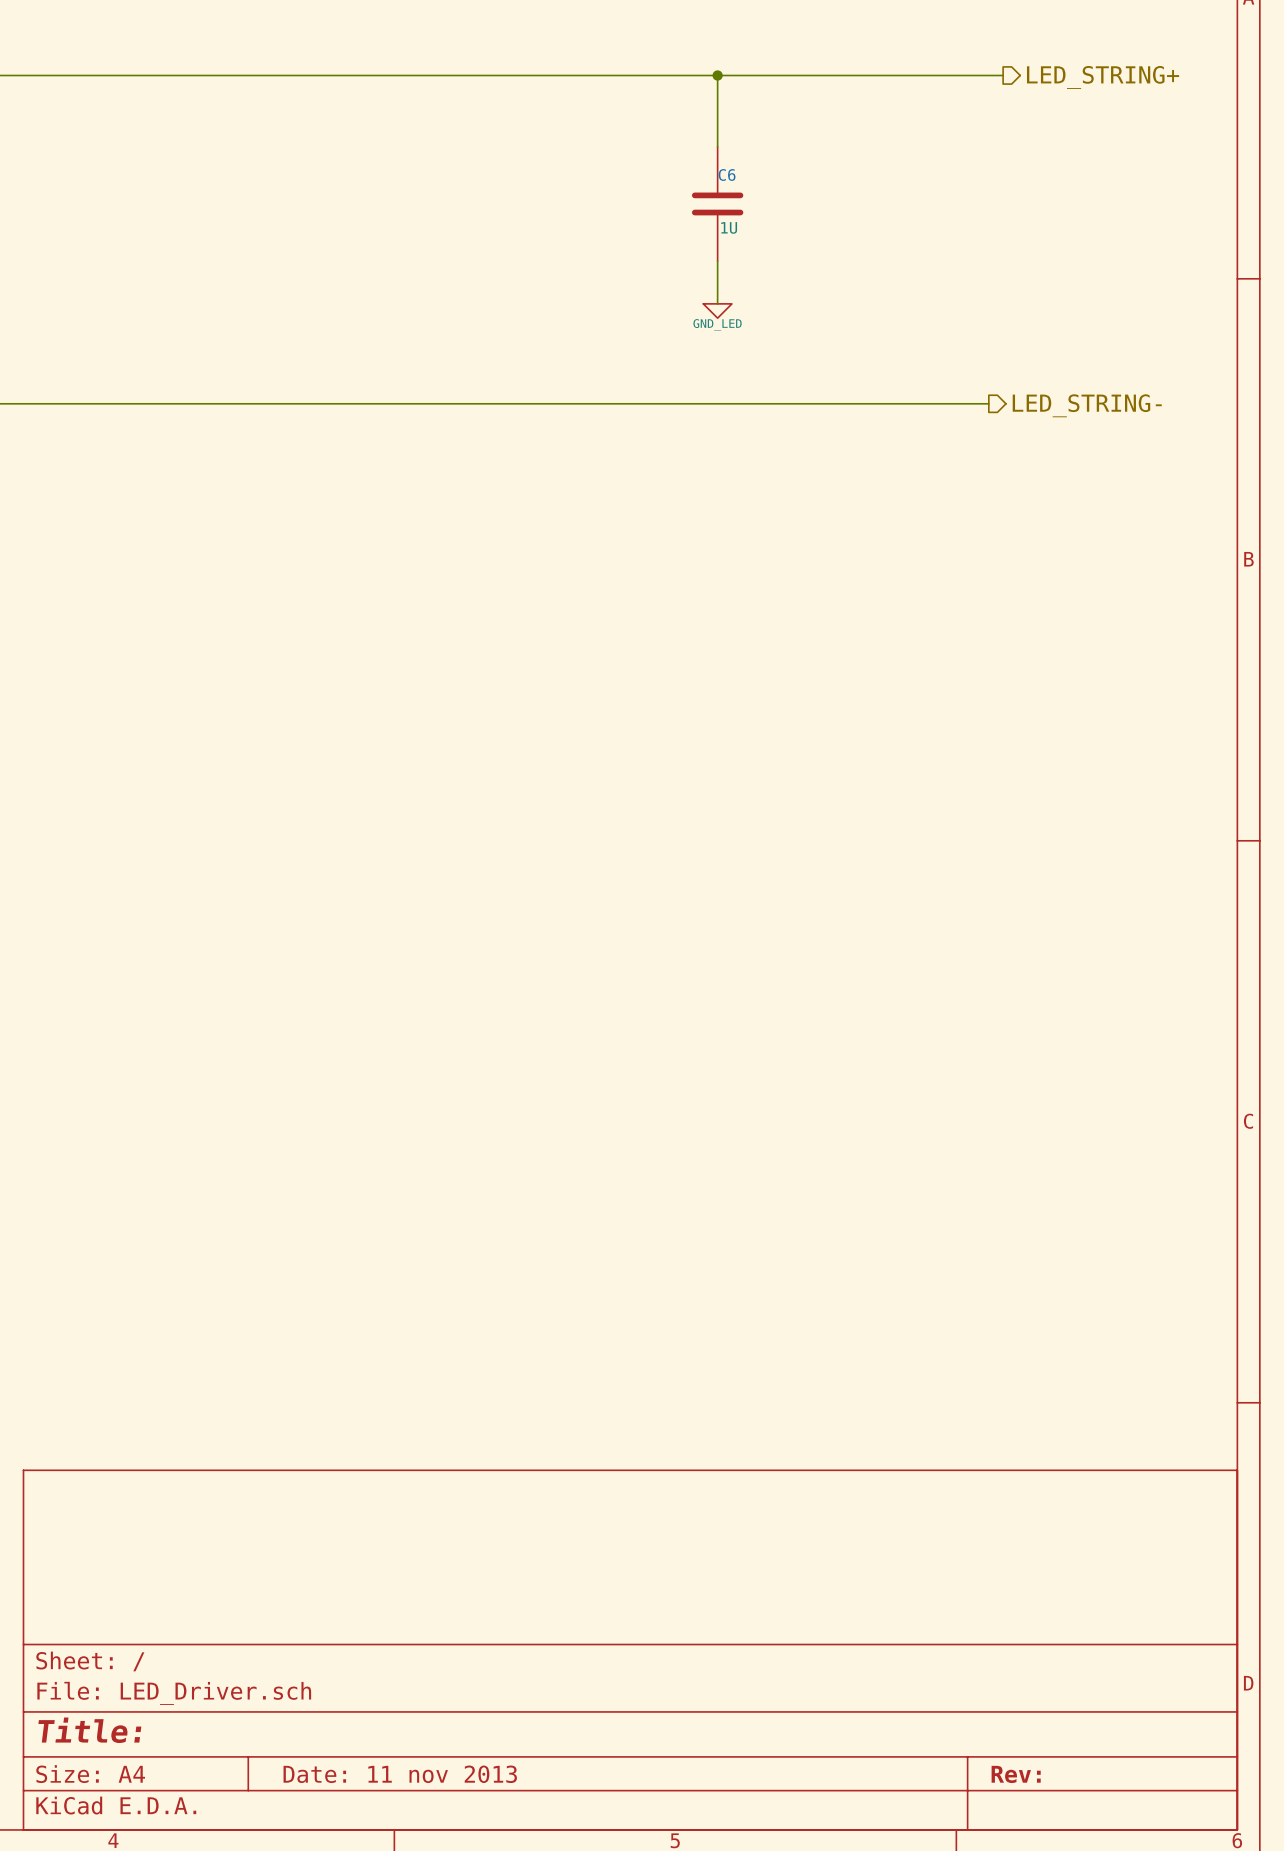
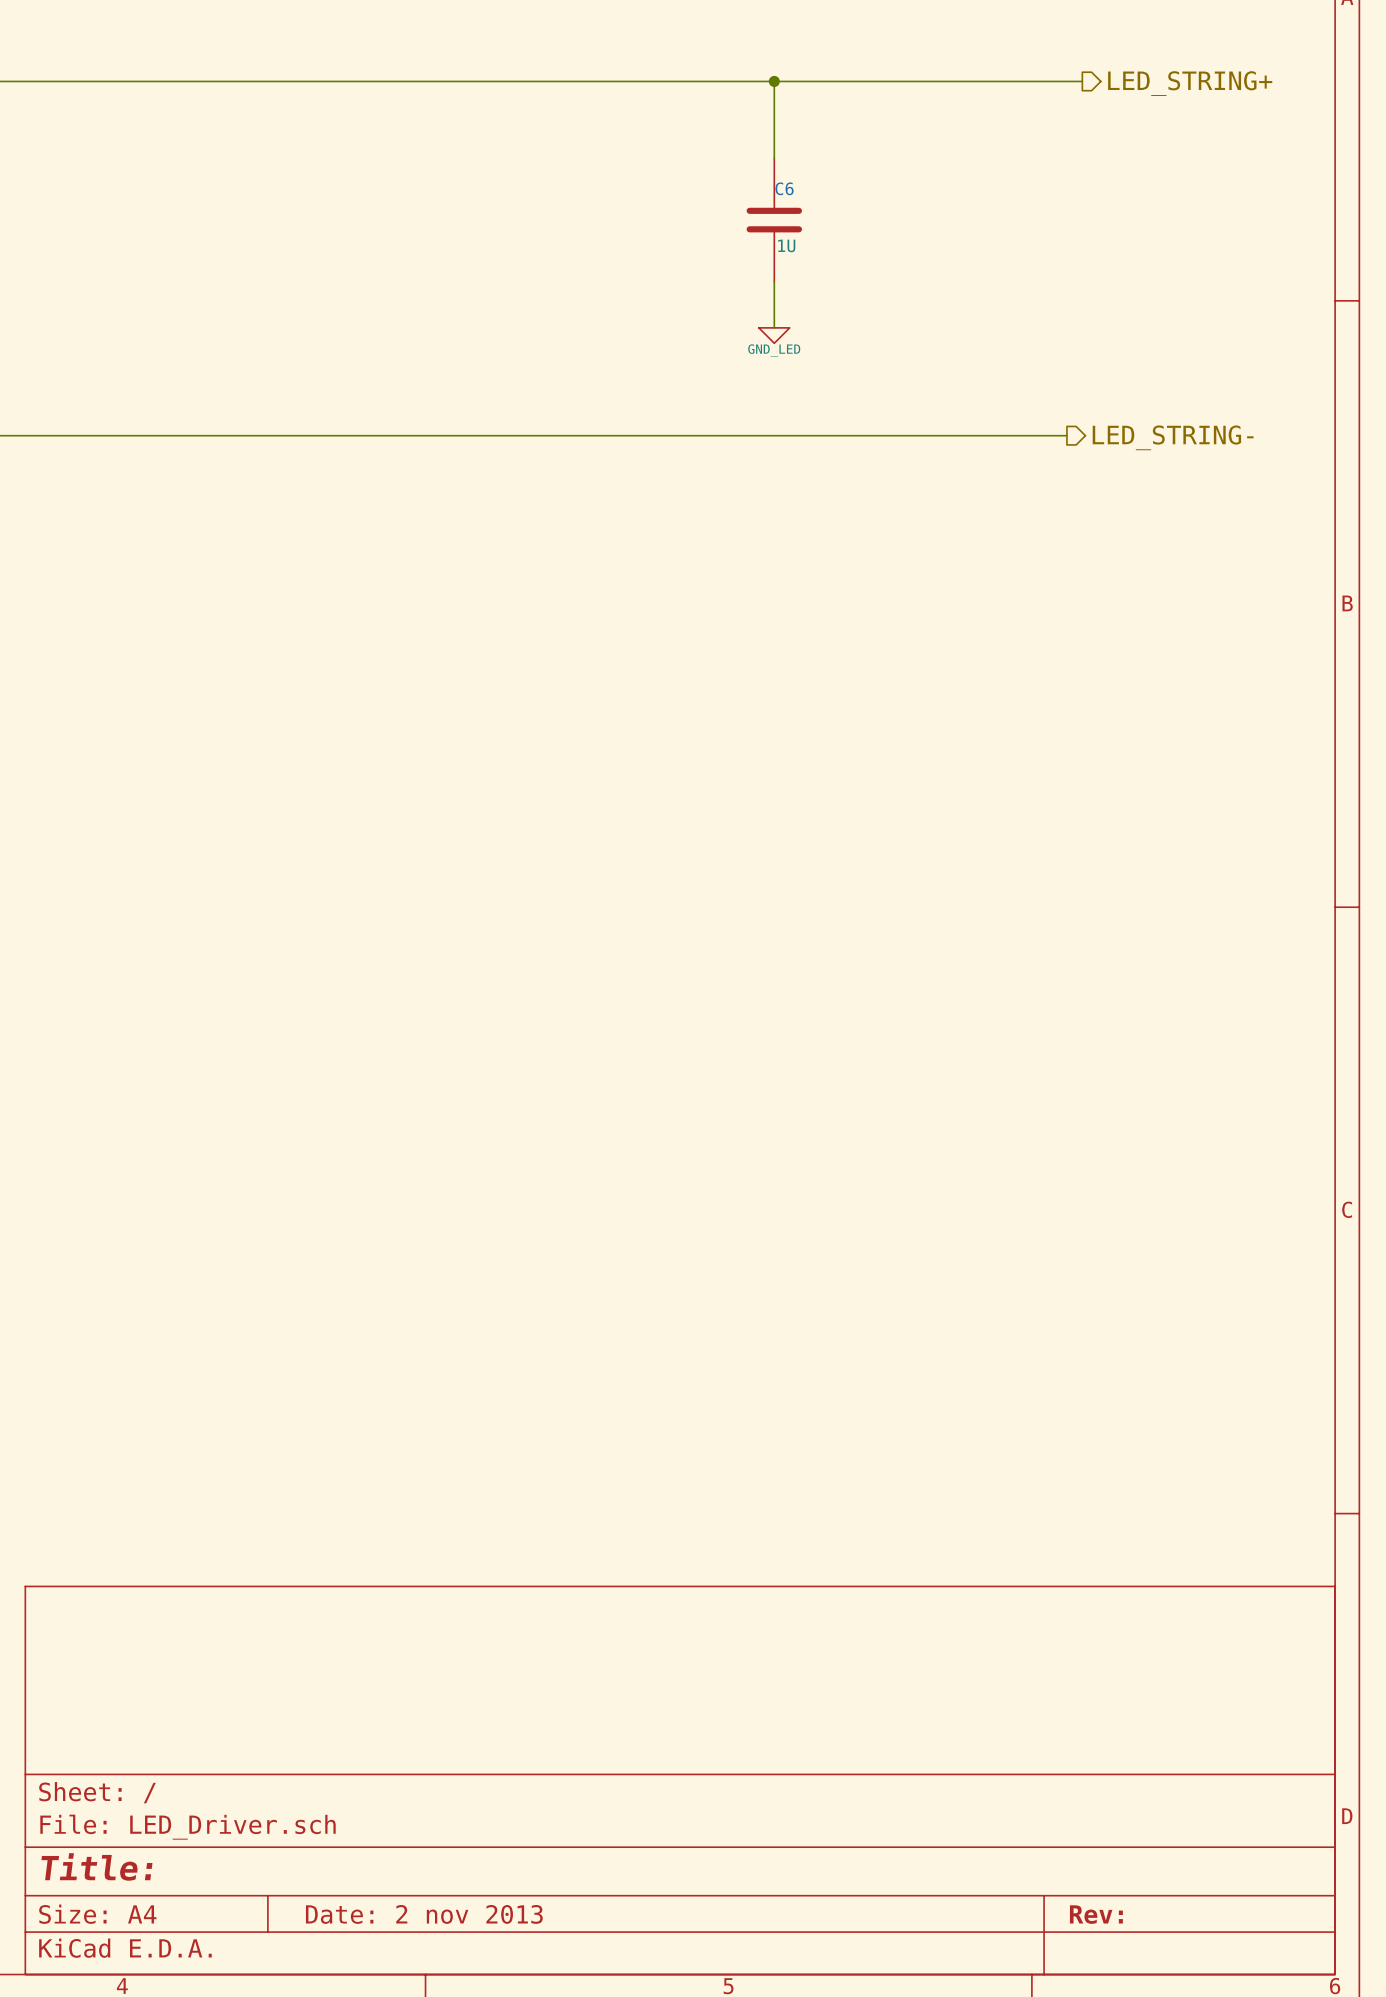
title block: Date: 11 nov 2013 (400, 1774) -> Date: 2 nov 2013 (424, 1914)

